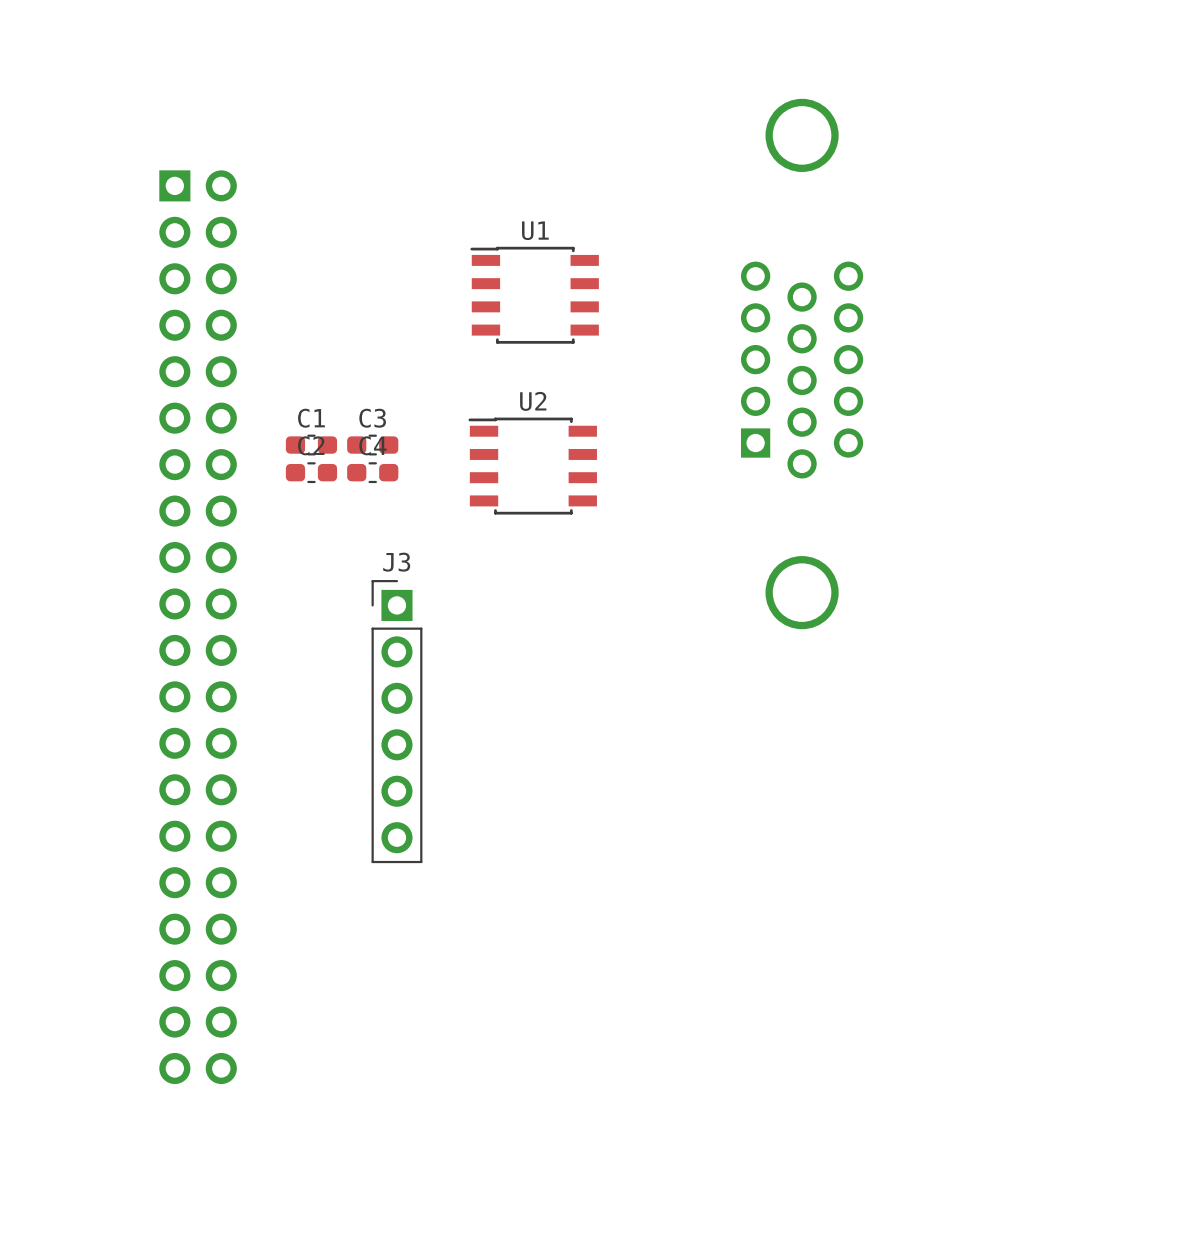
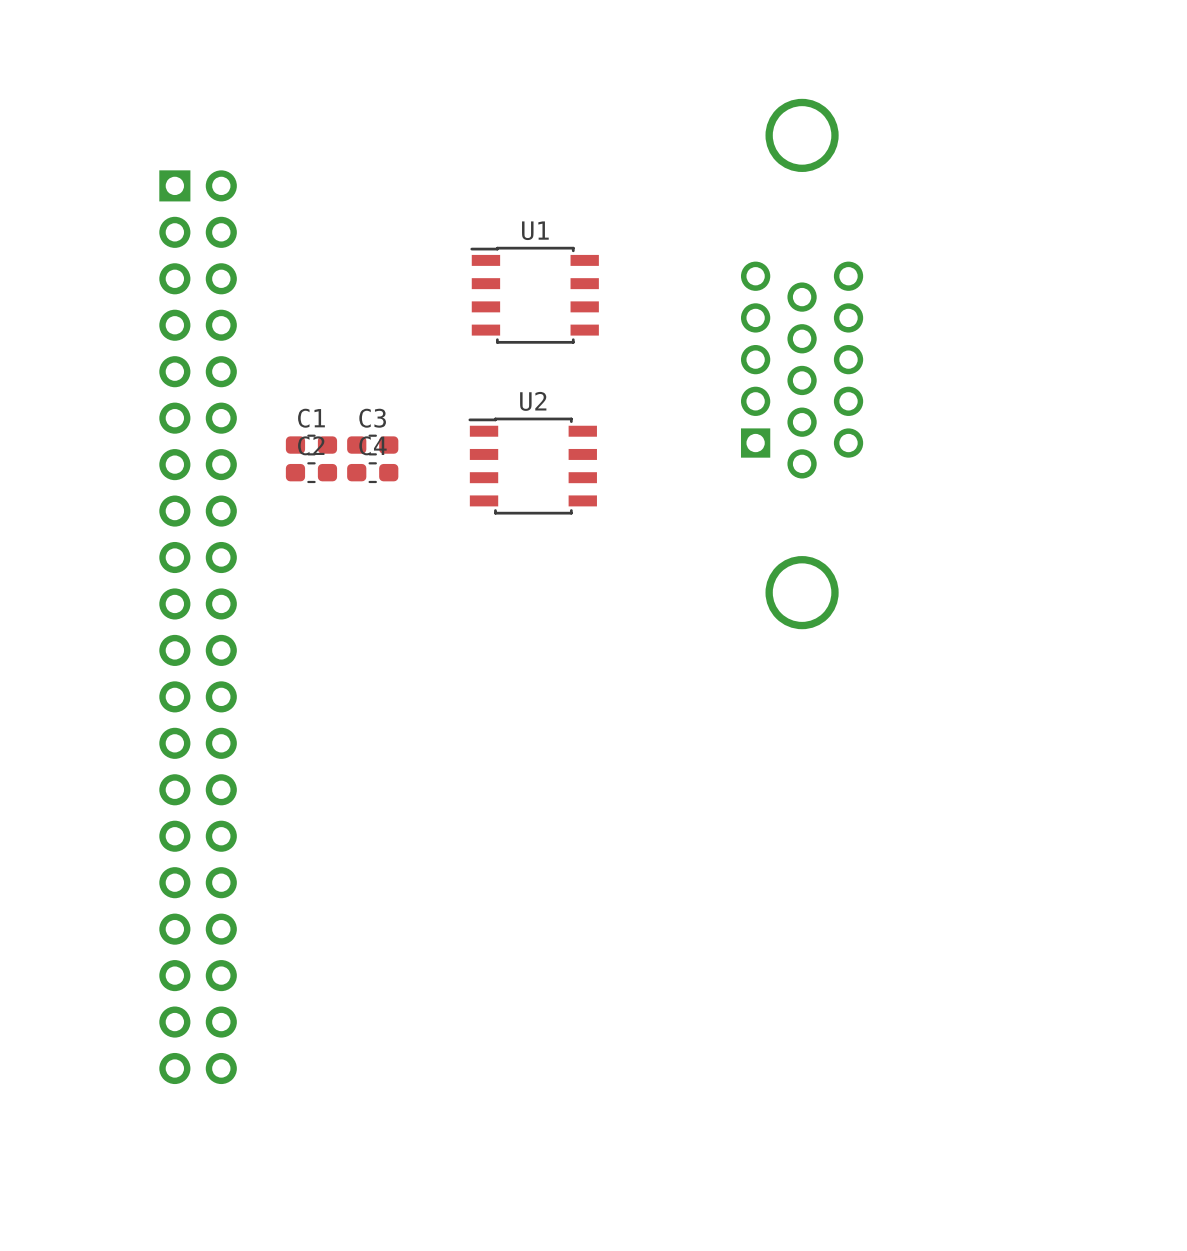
J3: (396, 721) -> none

